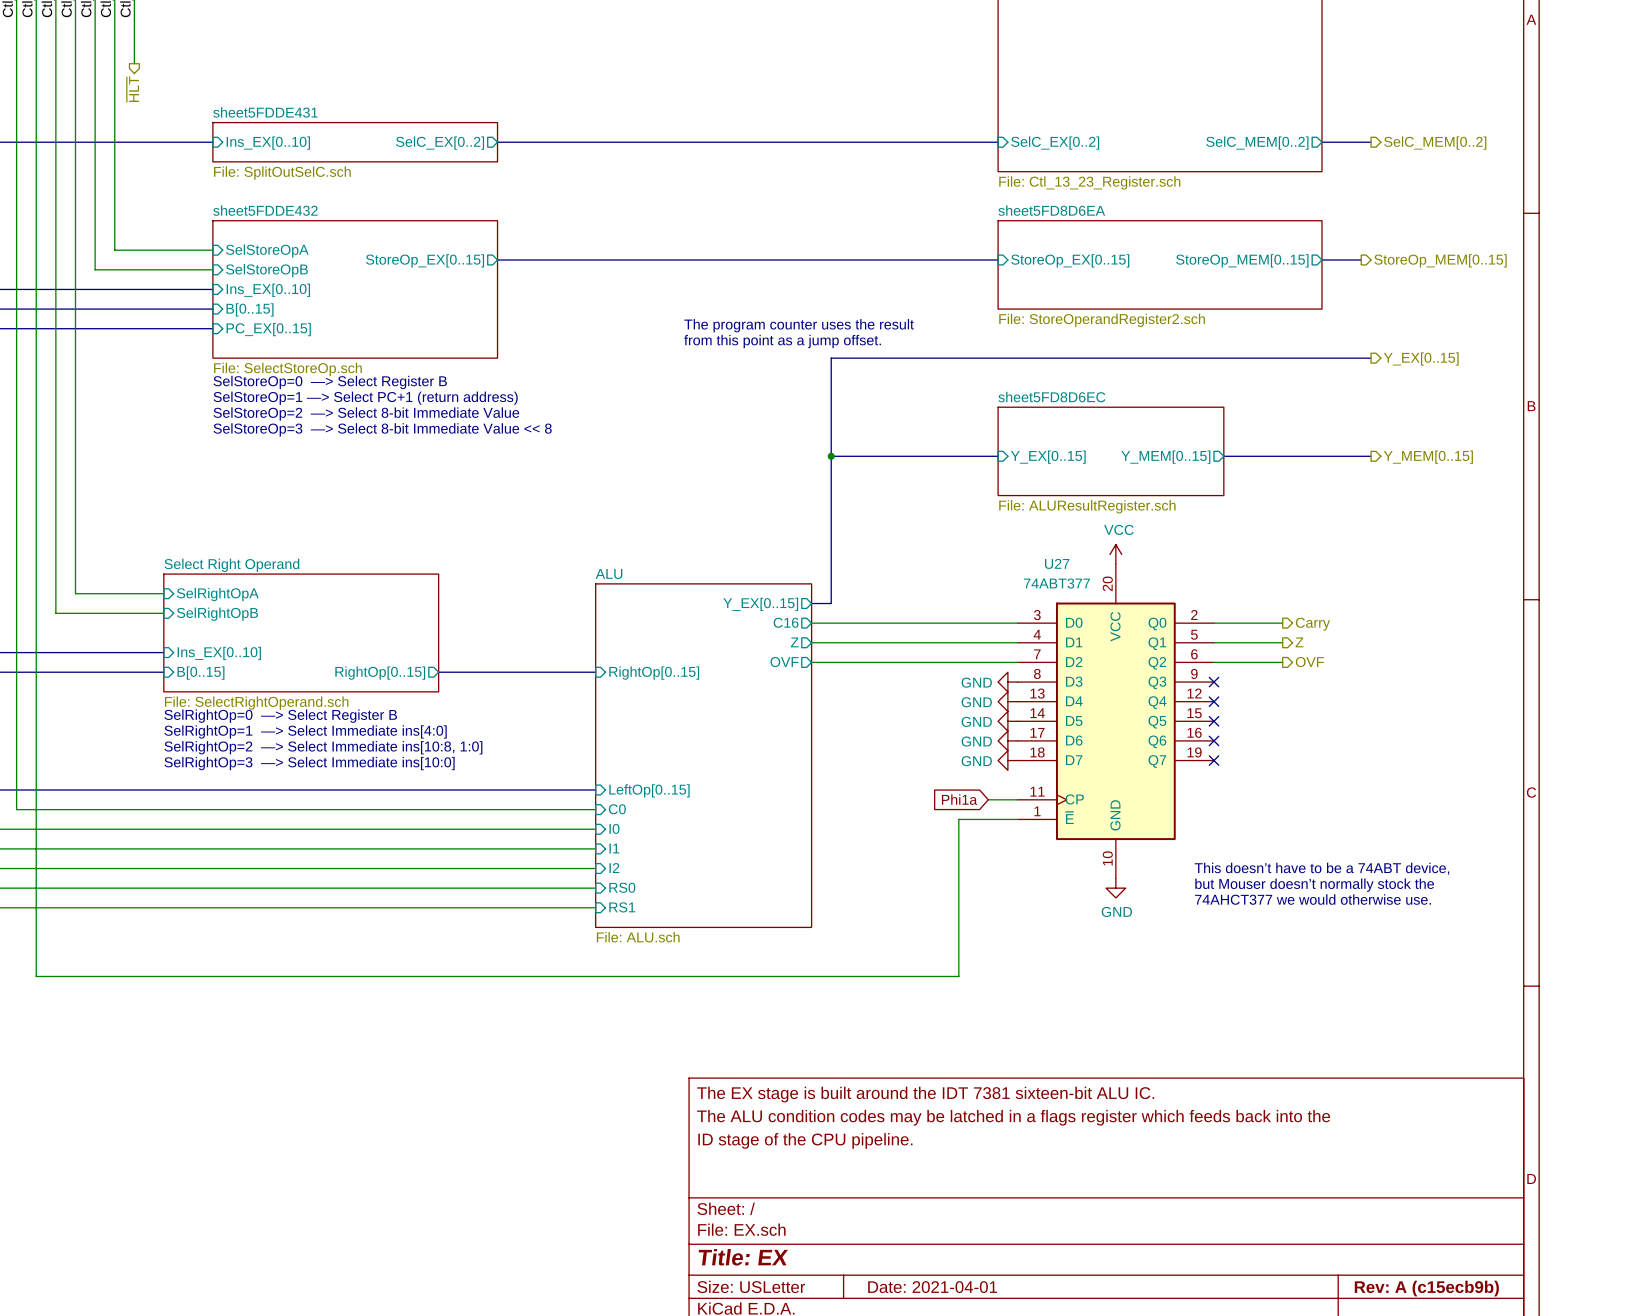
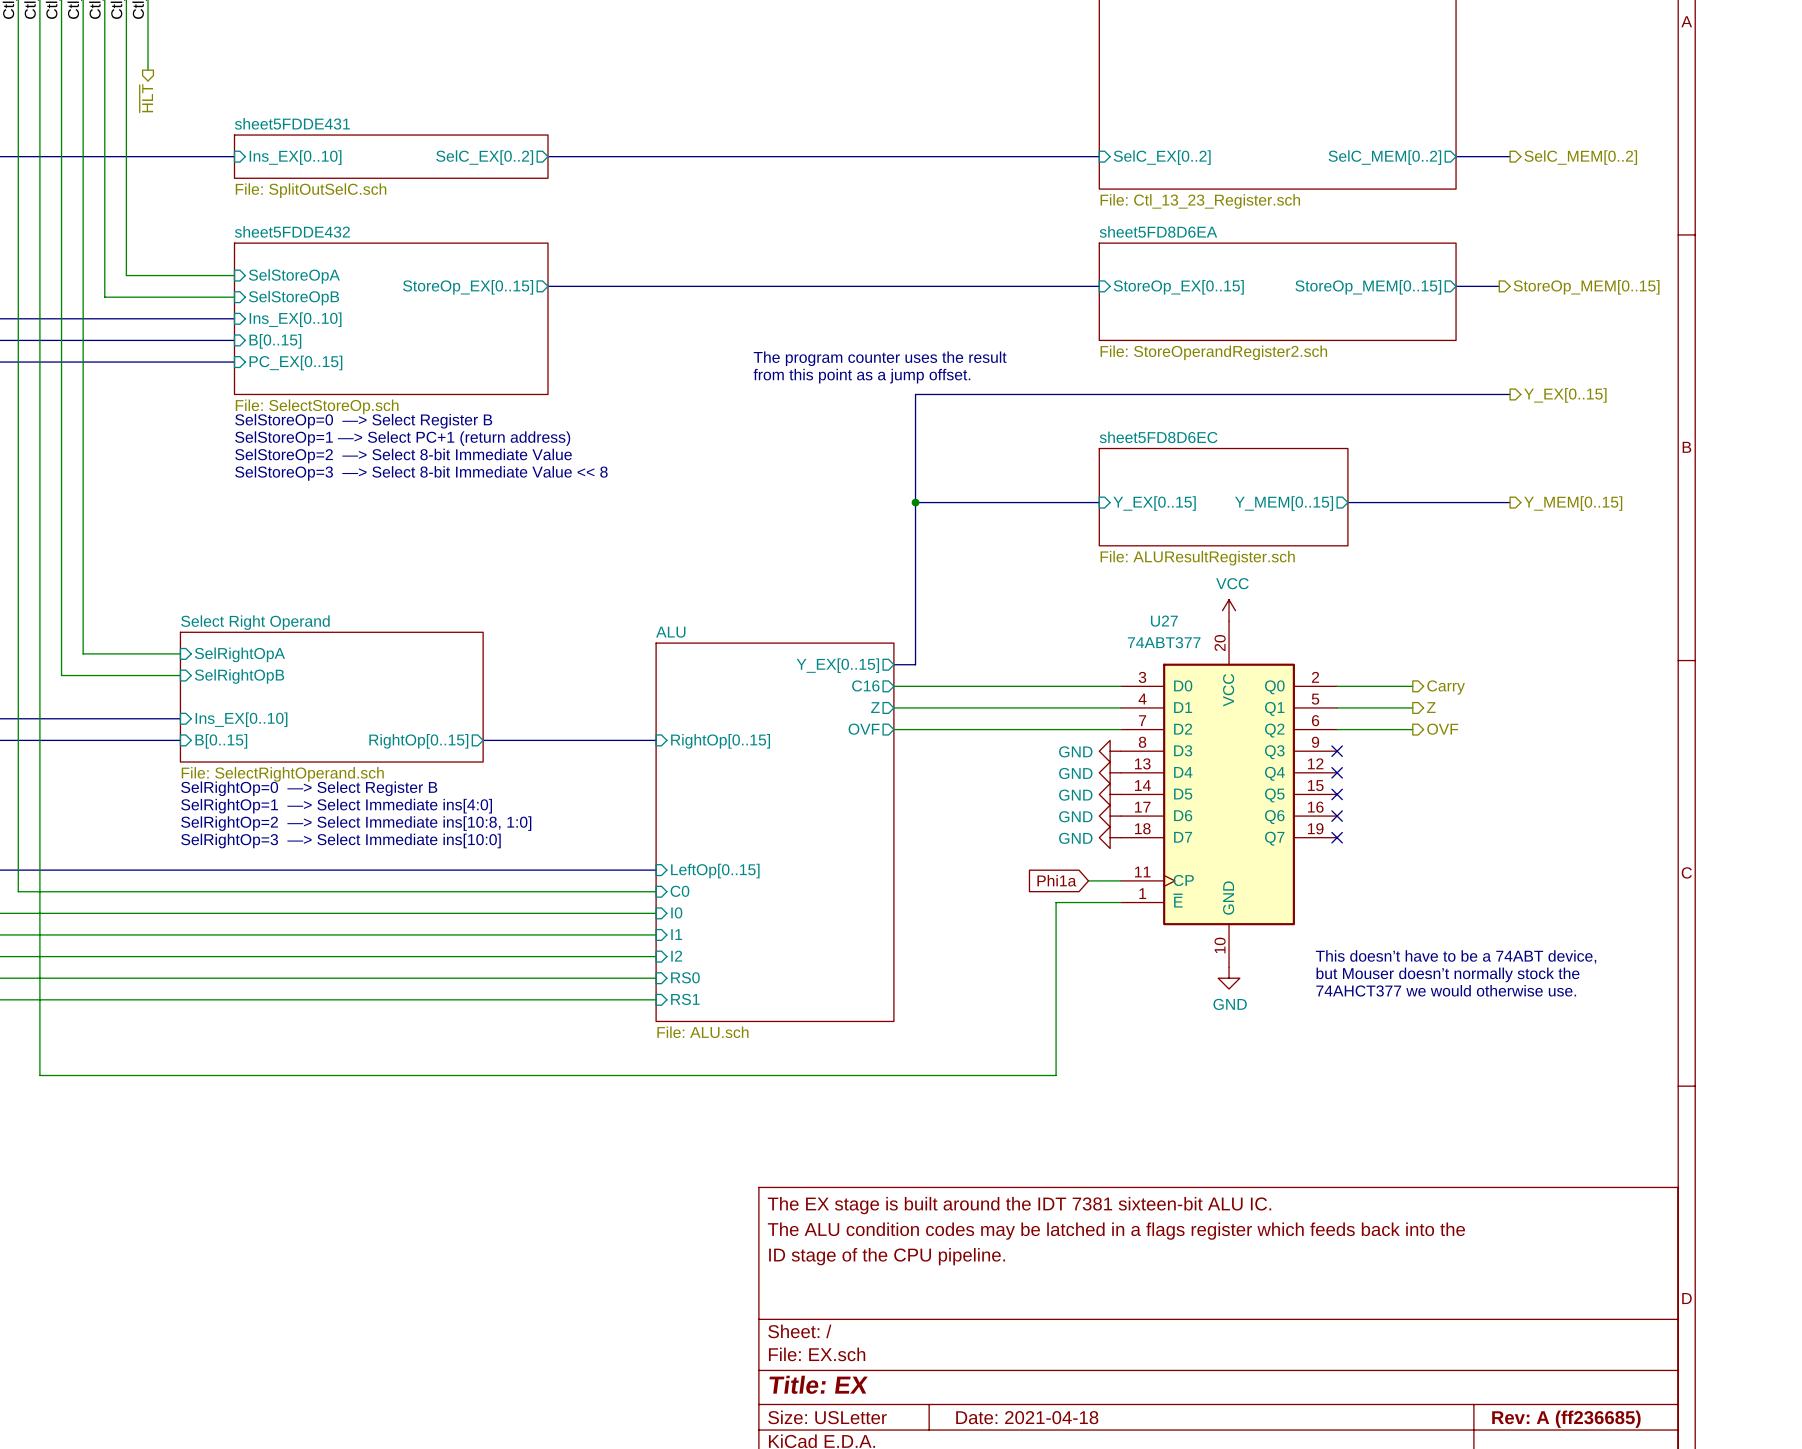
title block: Date: 2021-04-01 (932, 1287) -> Date: 2021-04-18 (1027, 1417)
title block: Rev: A (c15ecb9b) (1426, 1288) -> Rev: A (ff236685) (1566, 1419)

